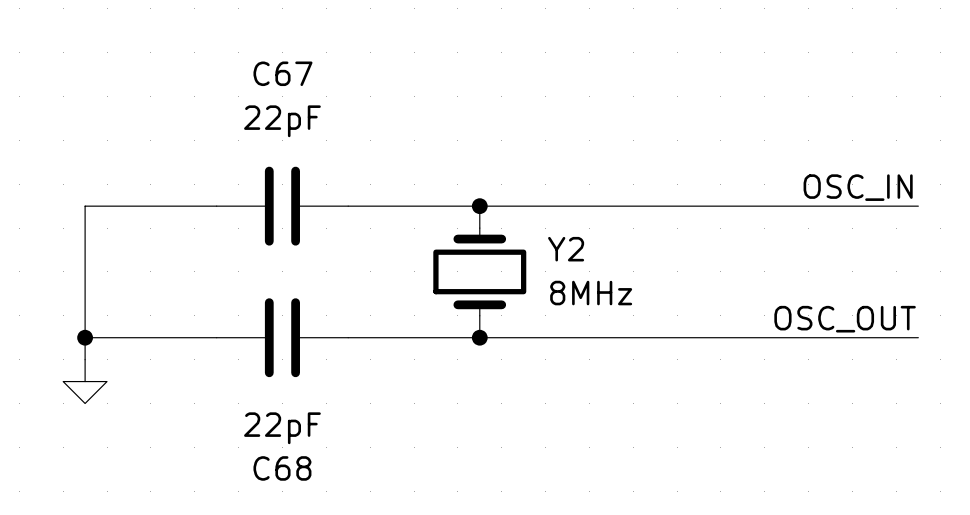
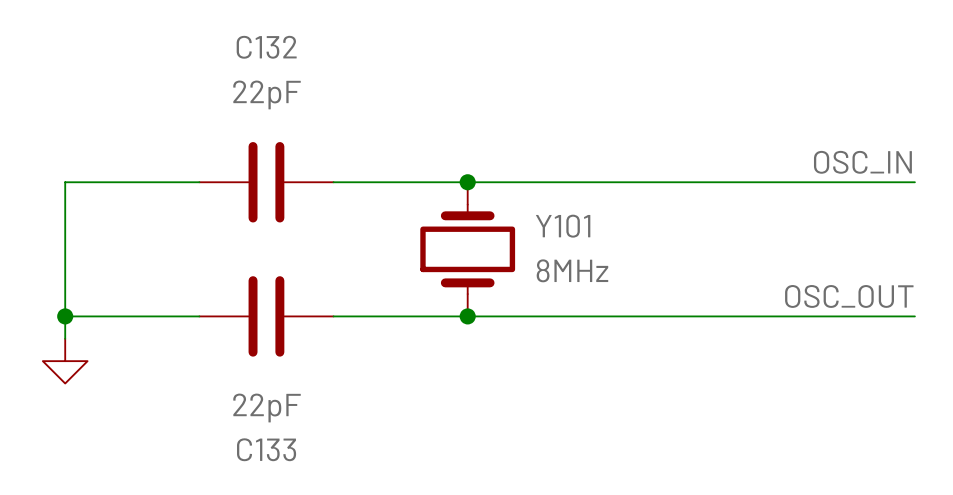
C67 name: C67 (282, 73) -> C132 (266, 47)
Y2 name: Y2 (566, 249) -> Y101 (563, 226)
C68 name: C68 (282, 468) -> C133 (266, 449)

